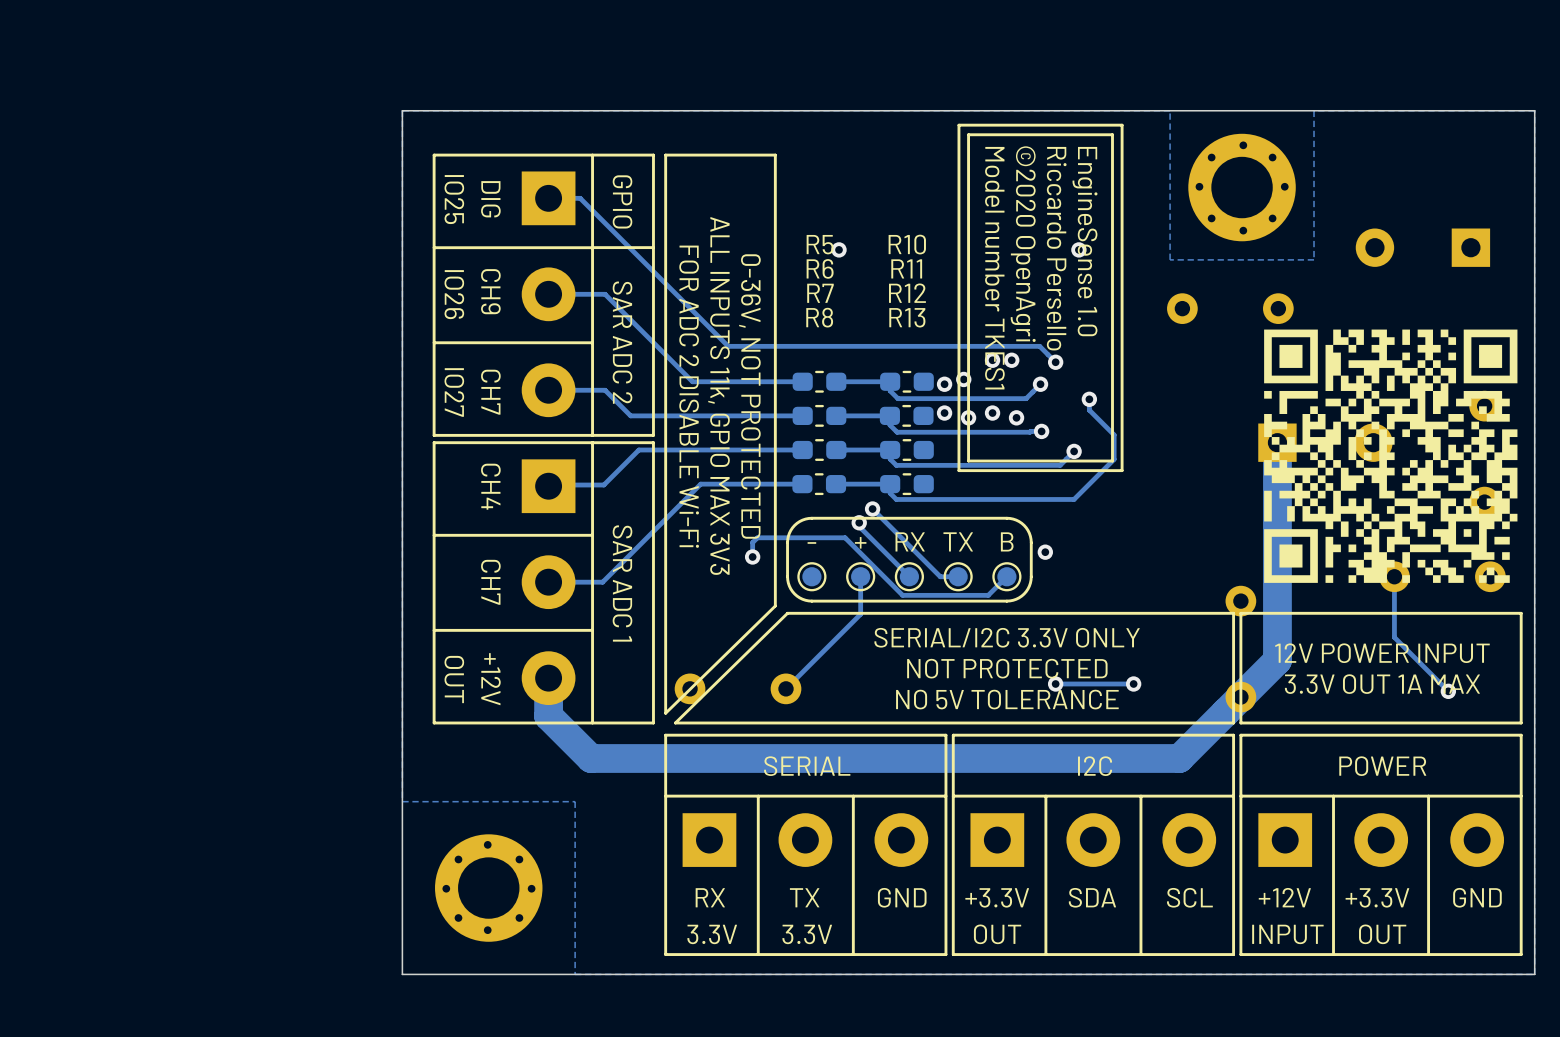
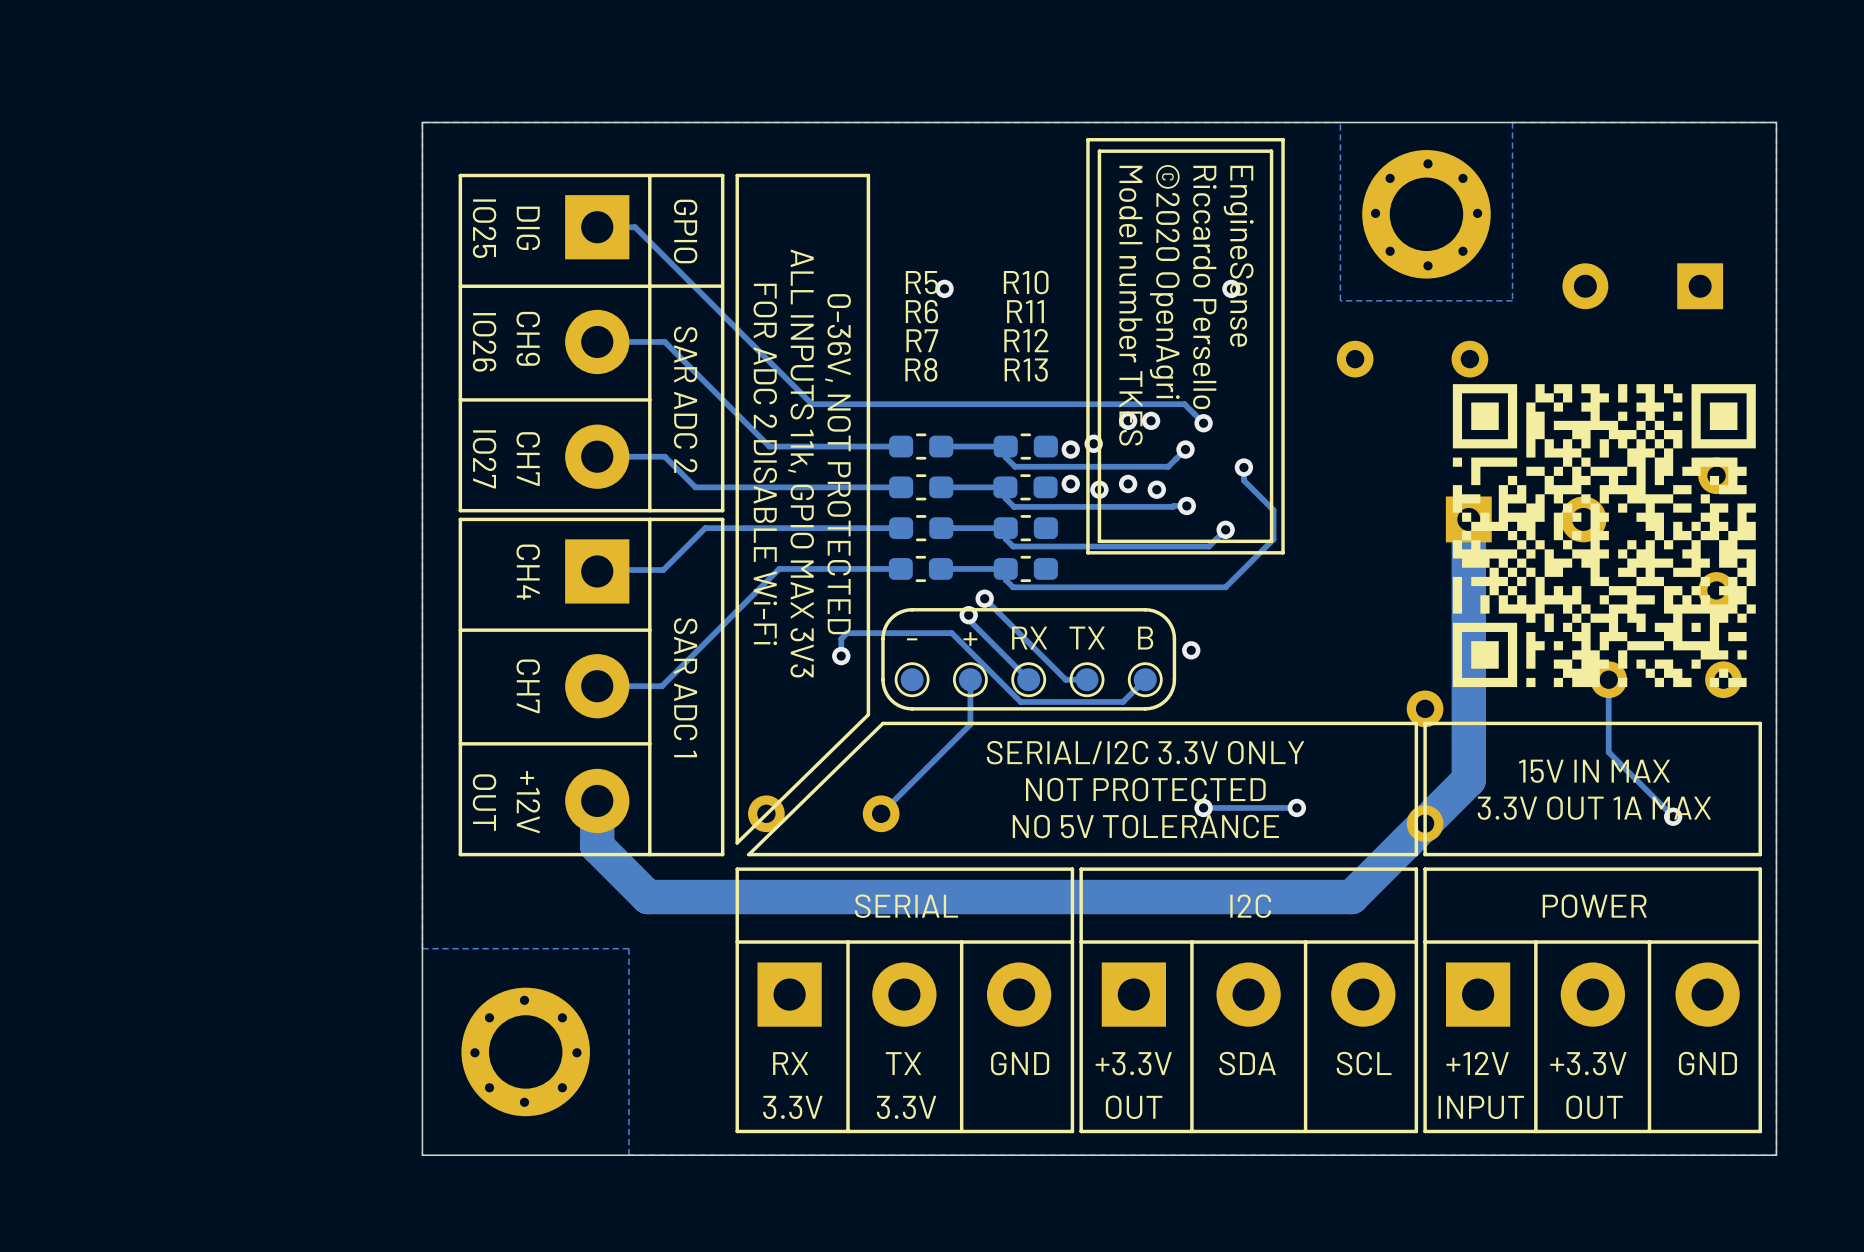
text: EngineSense 1.0 (1085, 241) -> EngineSense (1238, 256)
text: Model number TKES1 (994, 268) -> Model number TKES (1130, 305)
text: 12V POWER INPUT (1382, 653) -> 15V IN MAX (1594, 771)

